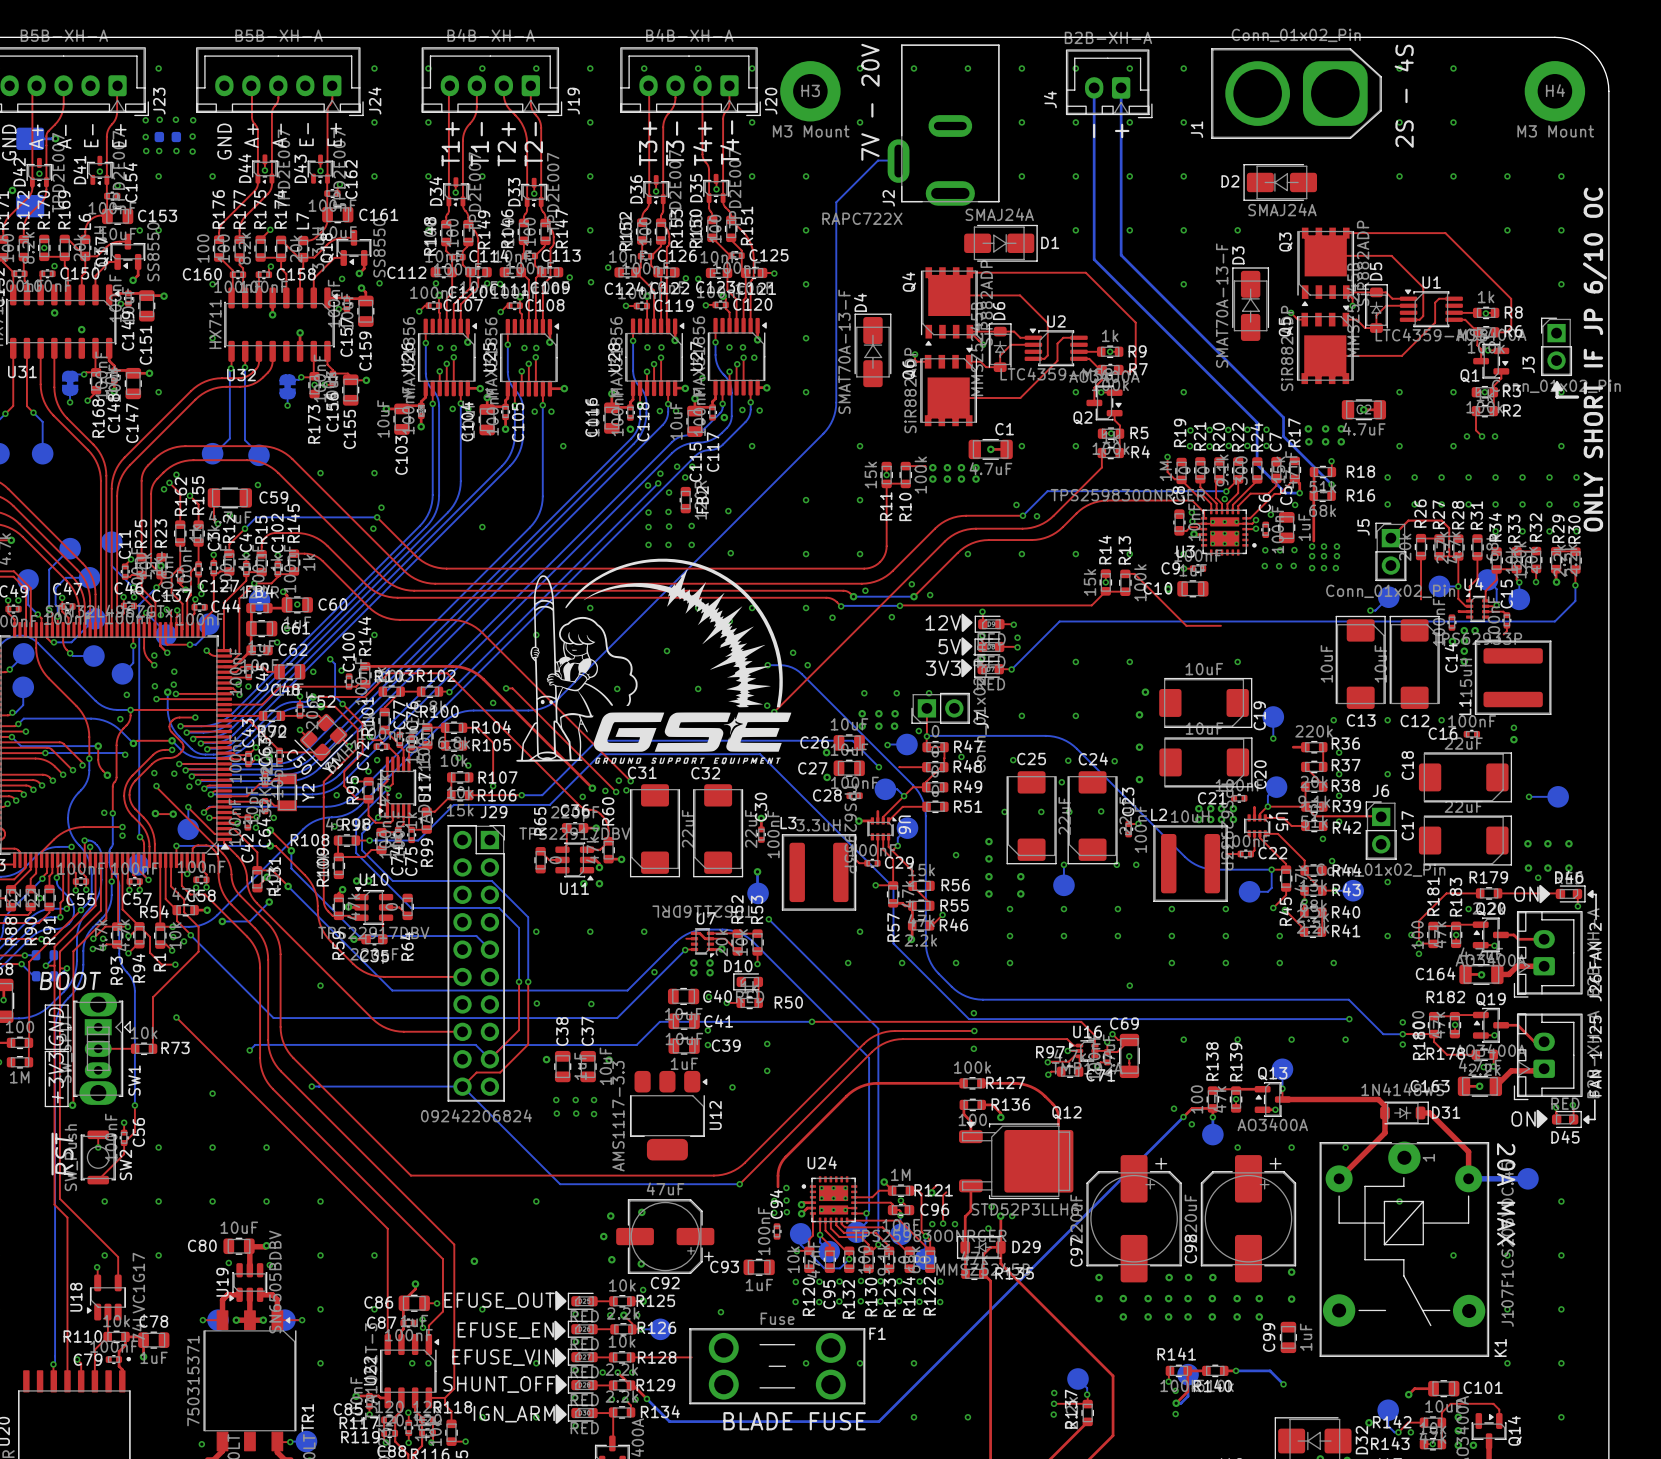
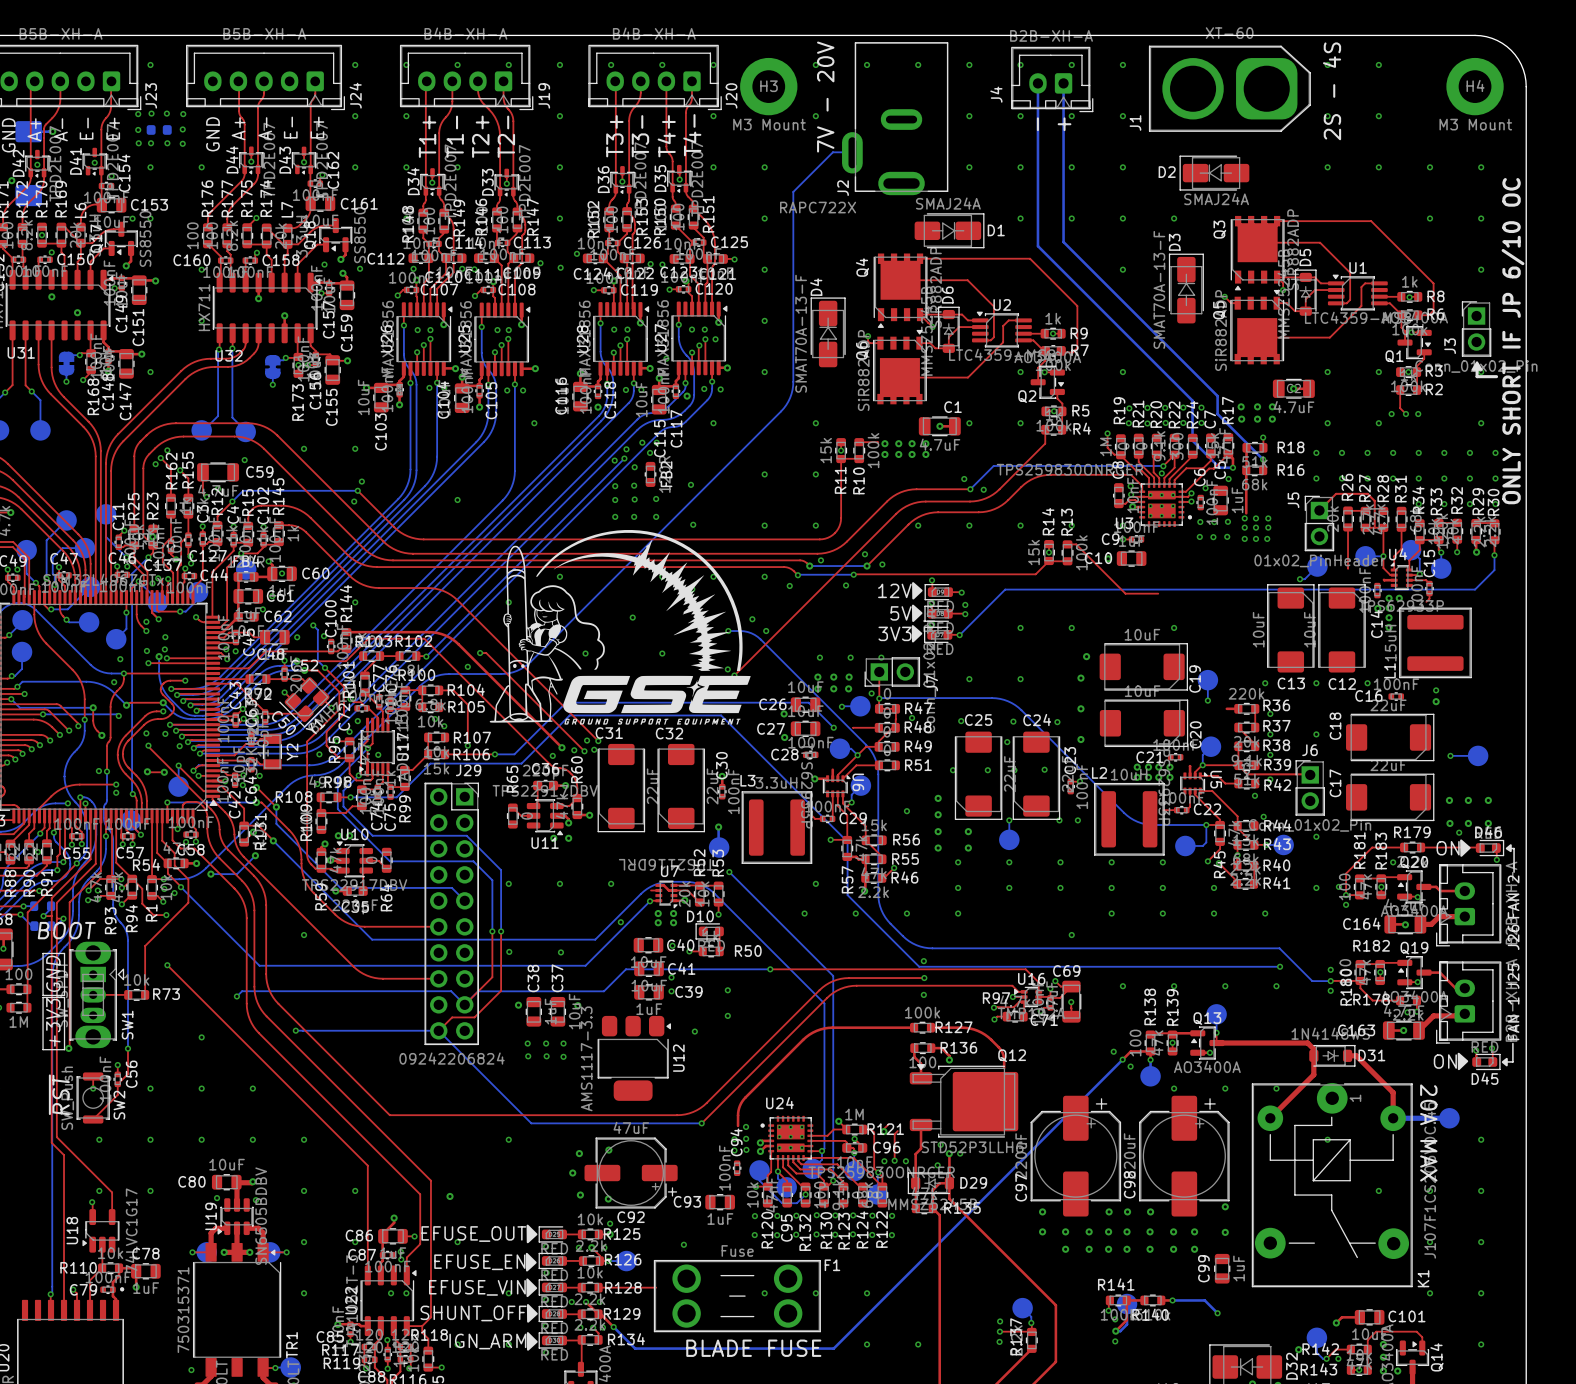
J1 value: Conn_01x02_Pin (1296, 35) -> XT-60 (1229, 33)
J5 value: Conn_01x02_Pin (1390, 591) -> 01x02_PinHeader (1319, 560)

